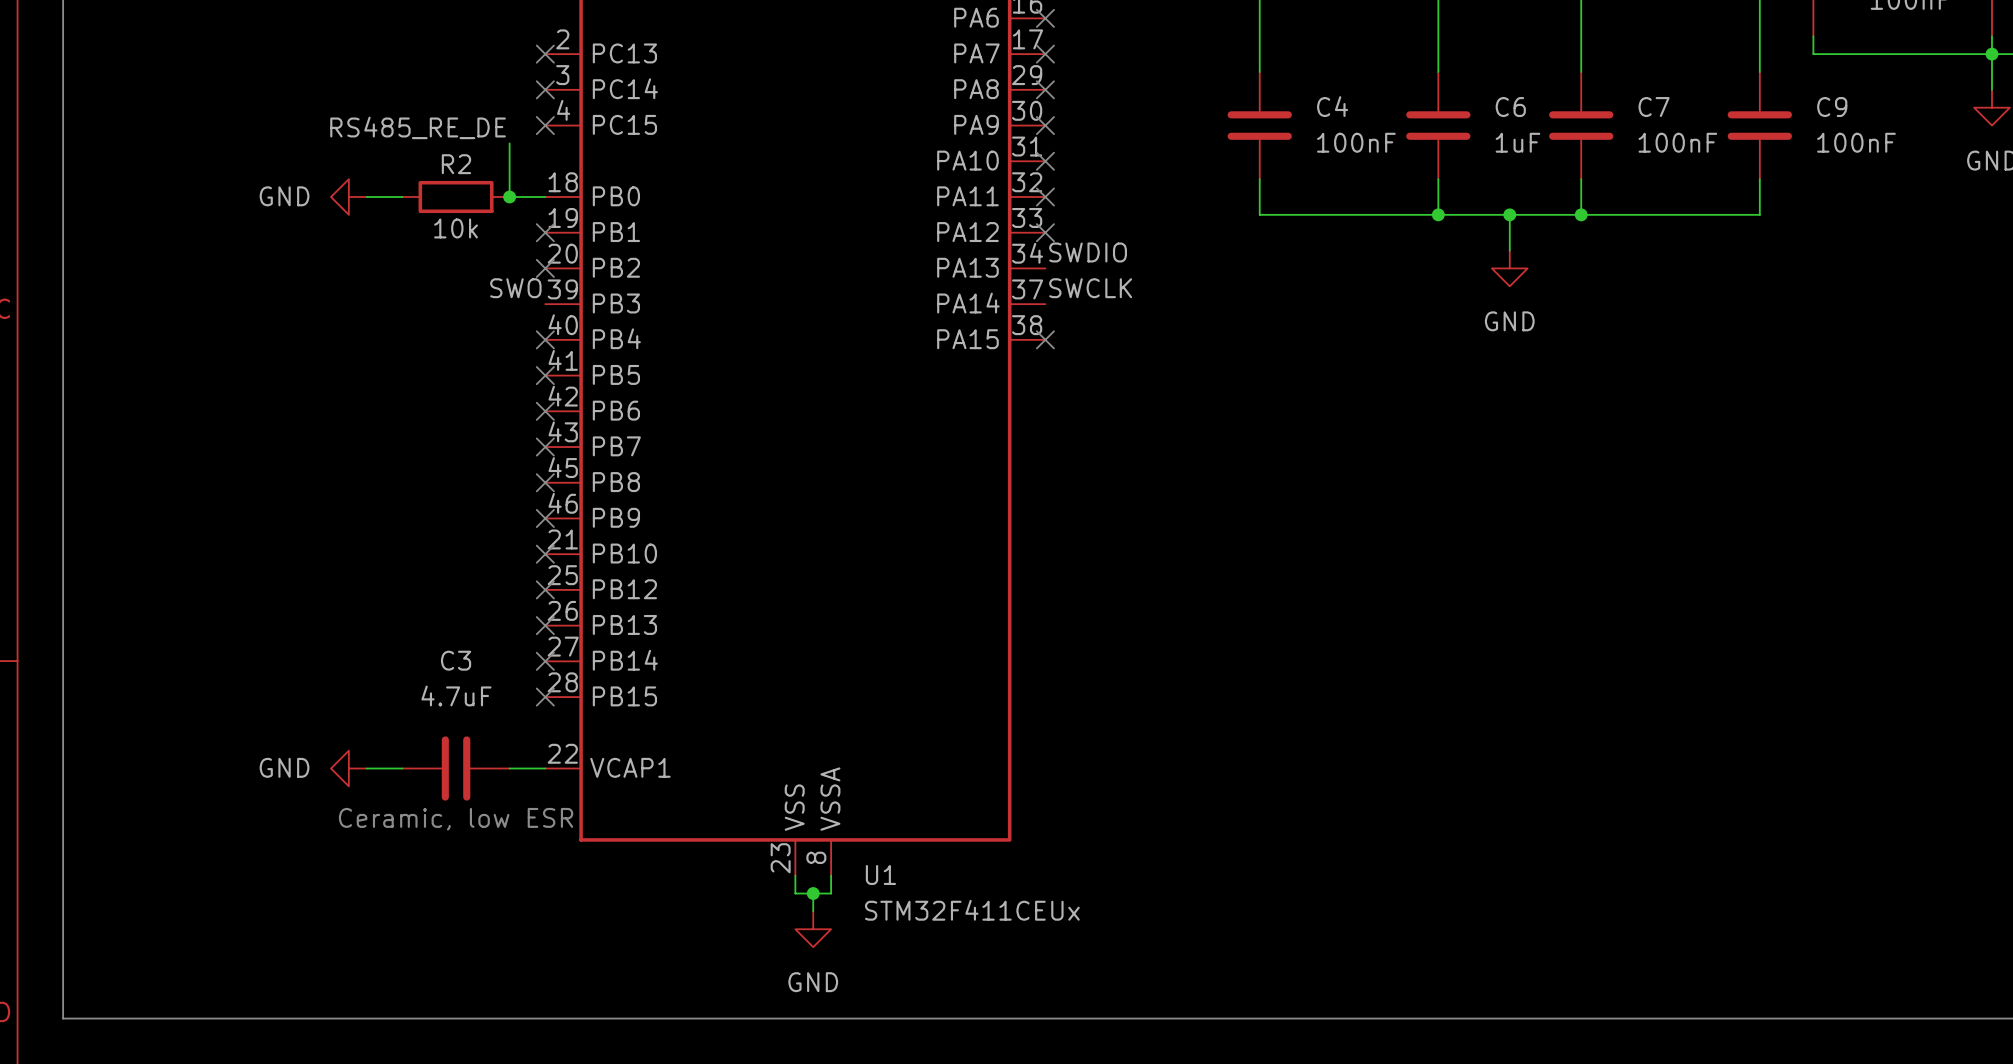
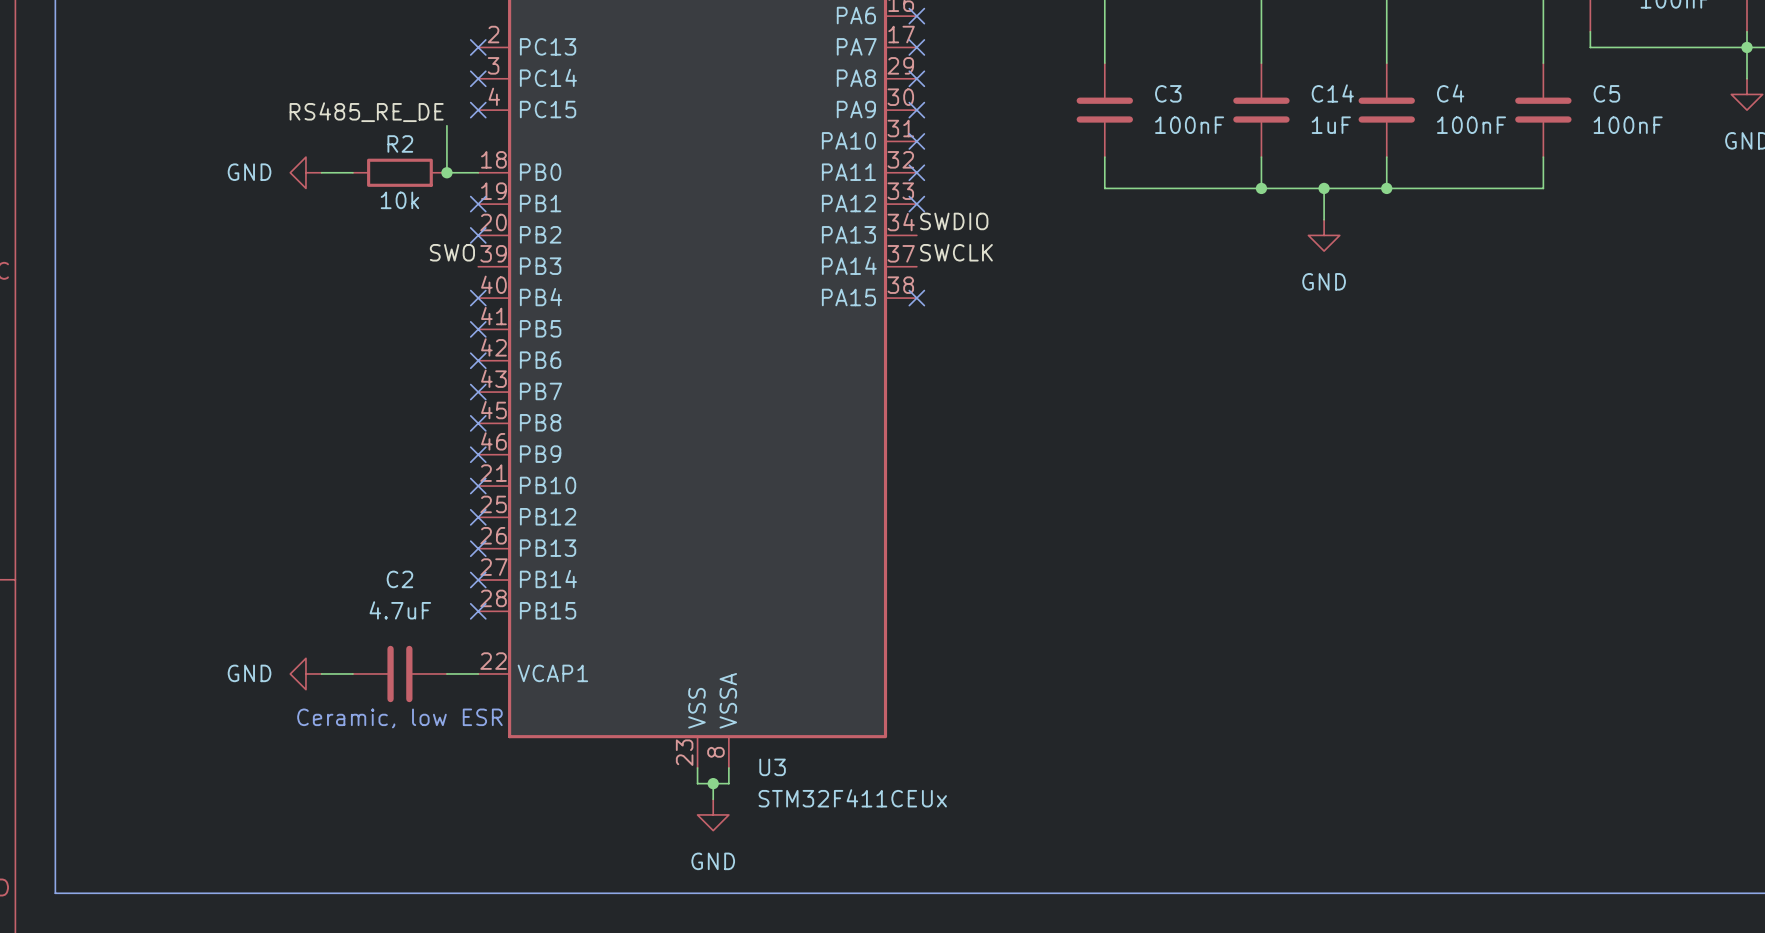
C4 name: C4 (1332, 106) -> C3 (1168, 93)
C6 name: C6 (1510, 107) -> C14 (1332, 93)
C7 name: C7 (1654, 107) -> C4 (1450, 93)
C9 name: C9 (1832, 107) -> C5 (1606, 93)
C3 name: C3 (456, 660) -> C2 (399, 579)
U1 name: U1 (880, 875) -> U3 (772, 767)

